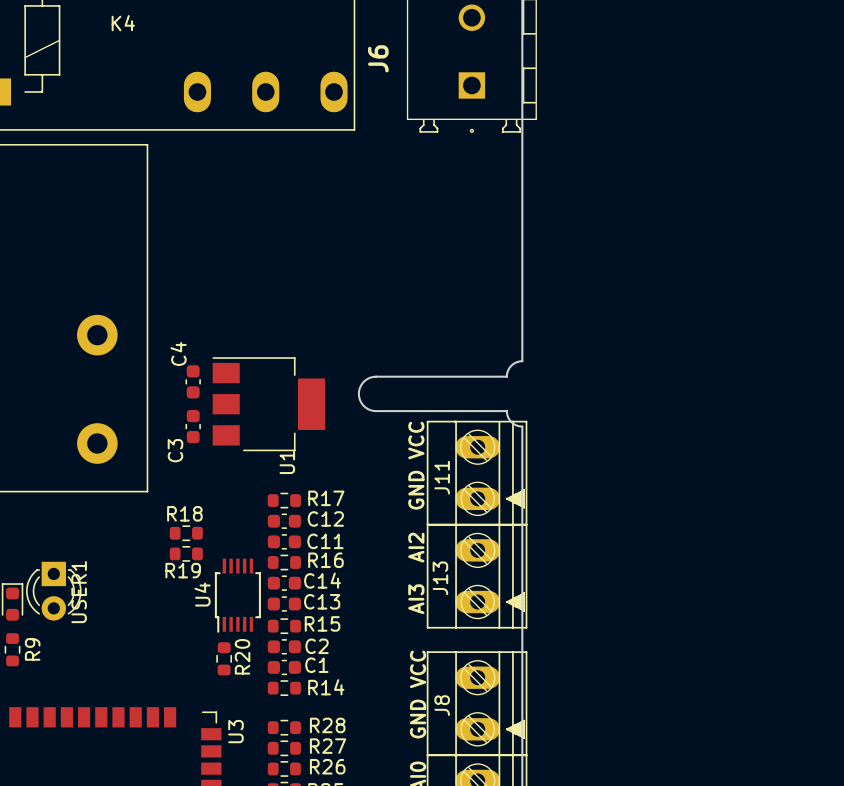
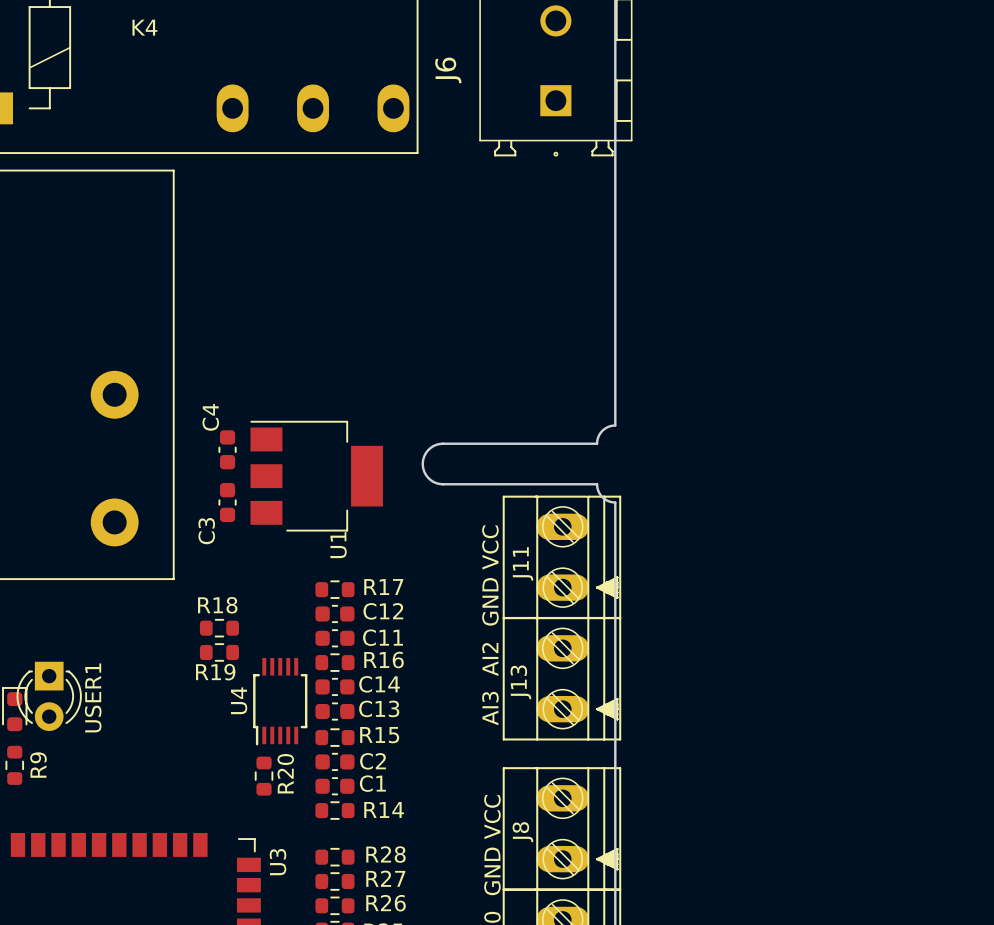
part footprint: [26, 561, 82, 621] -> [16, 661, 82, 732]

